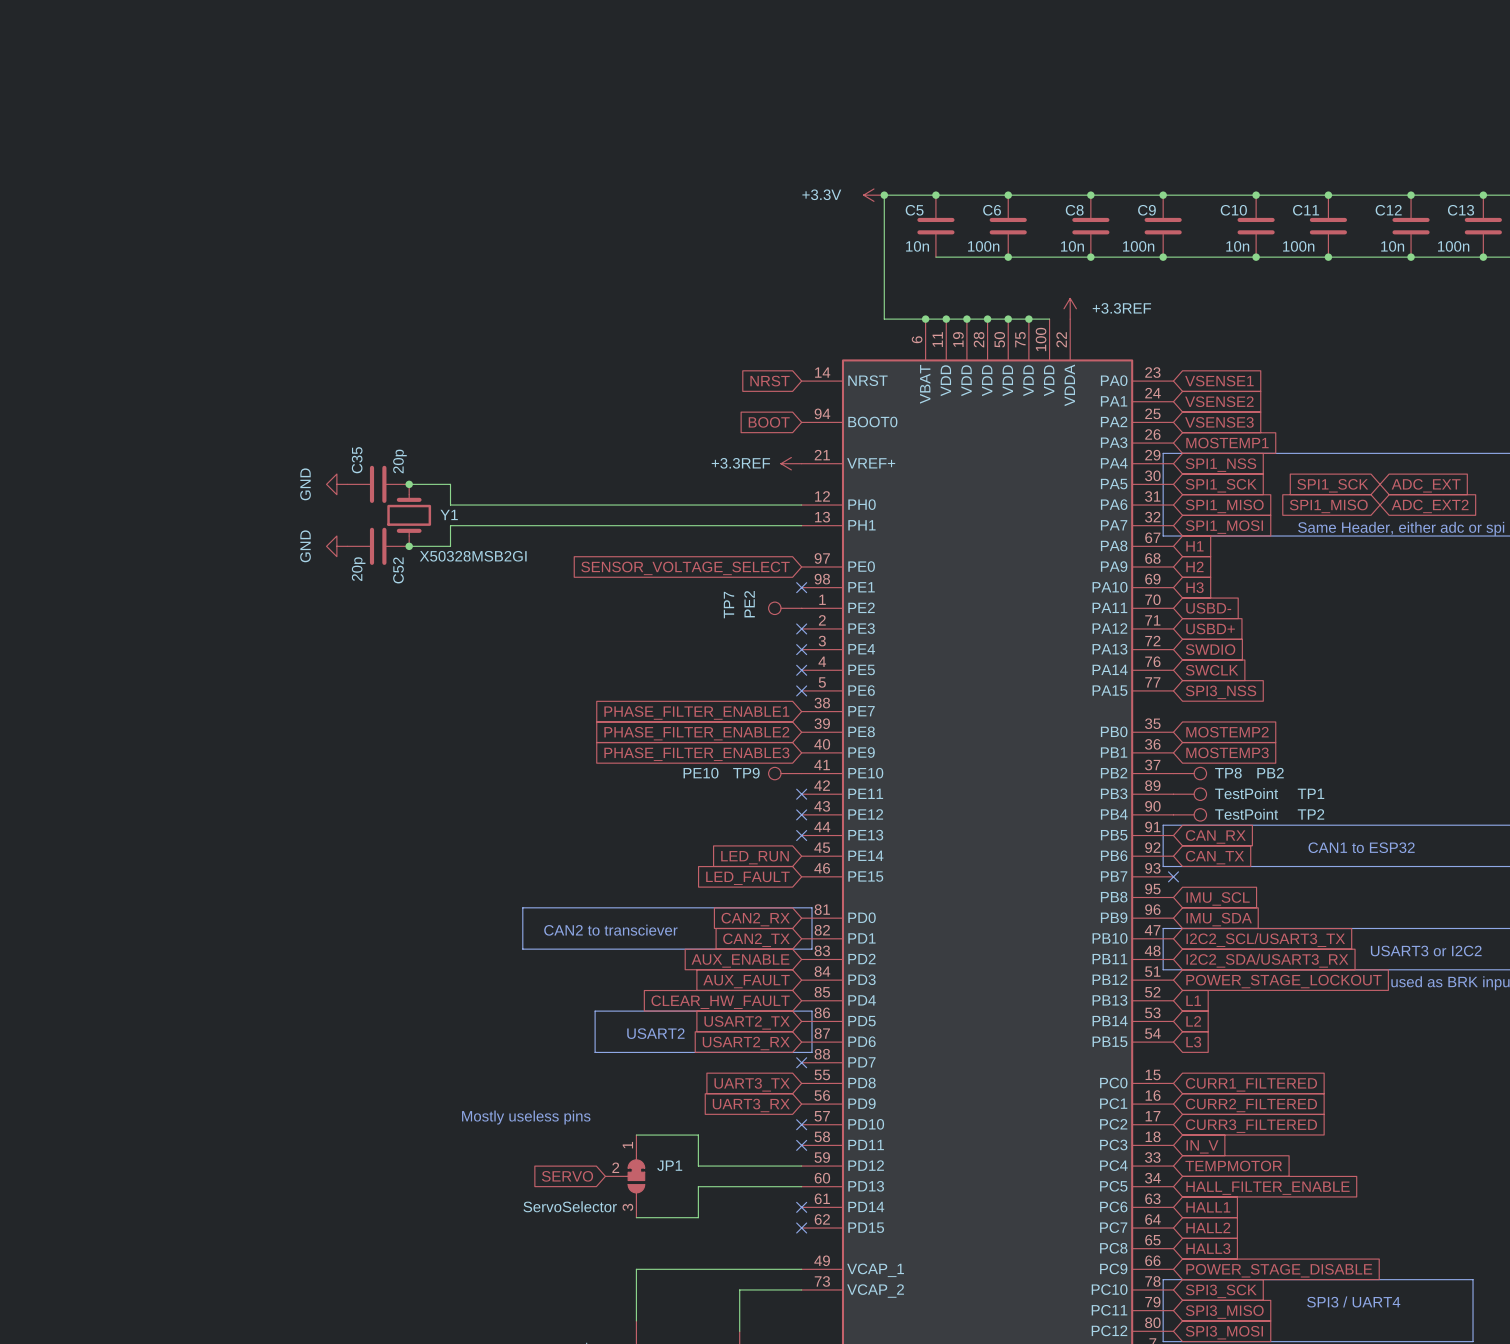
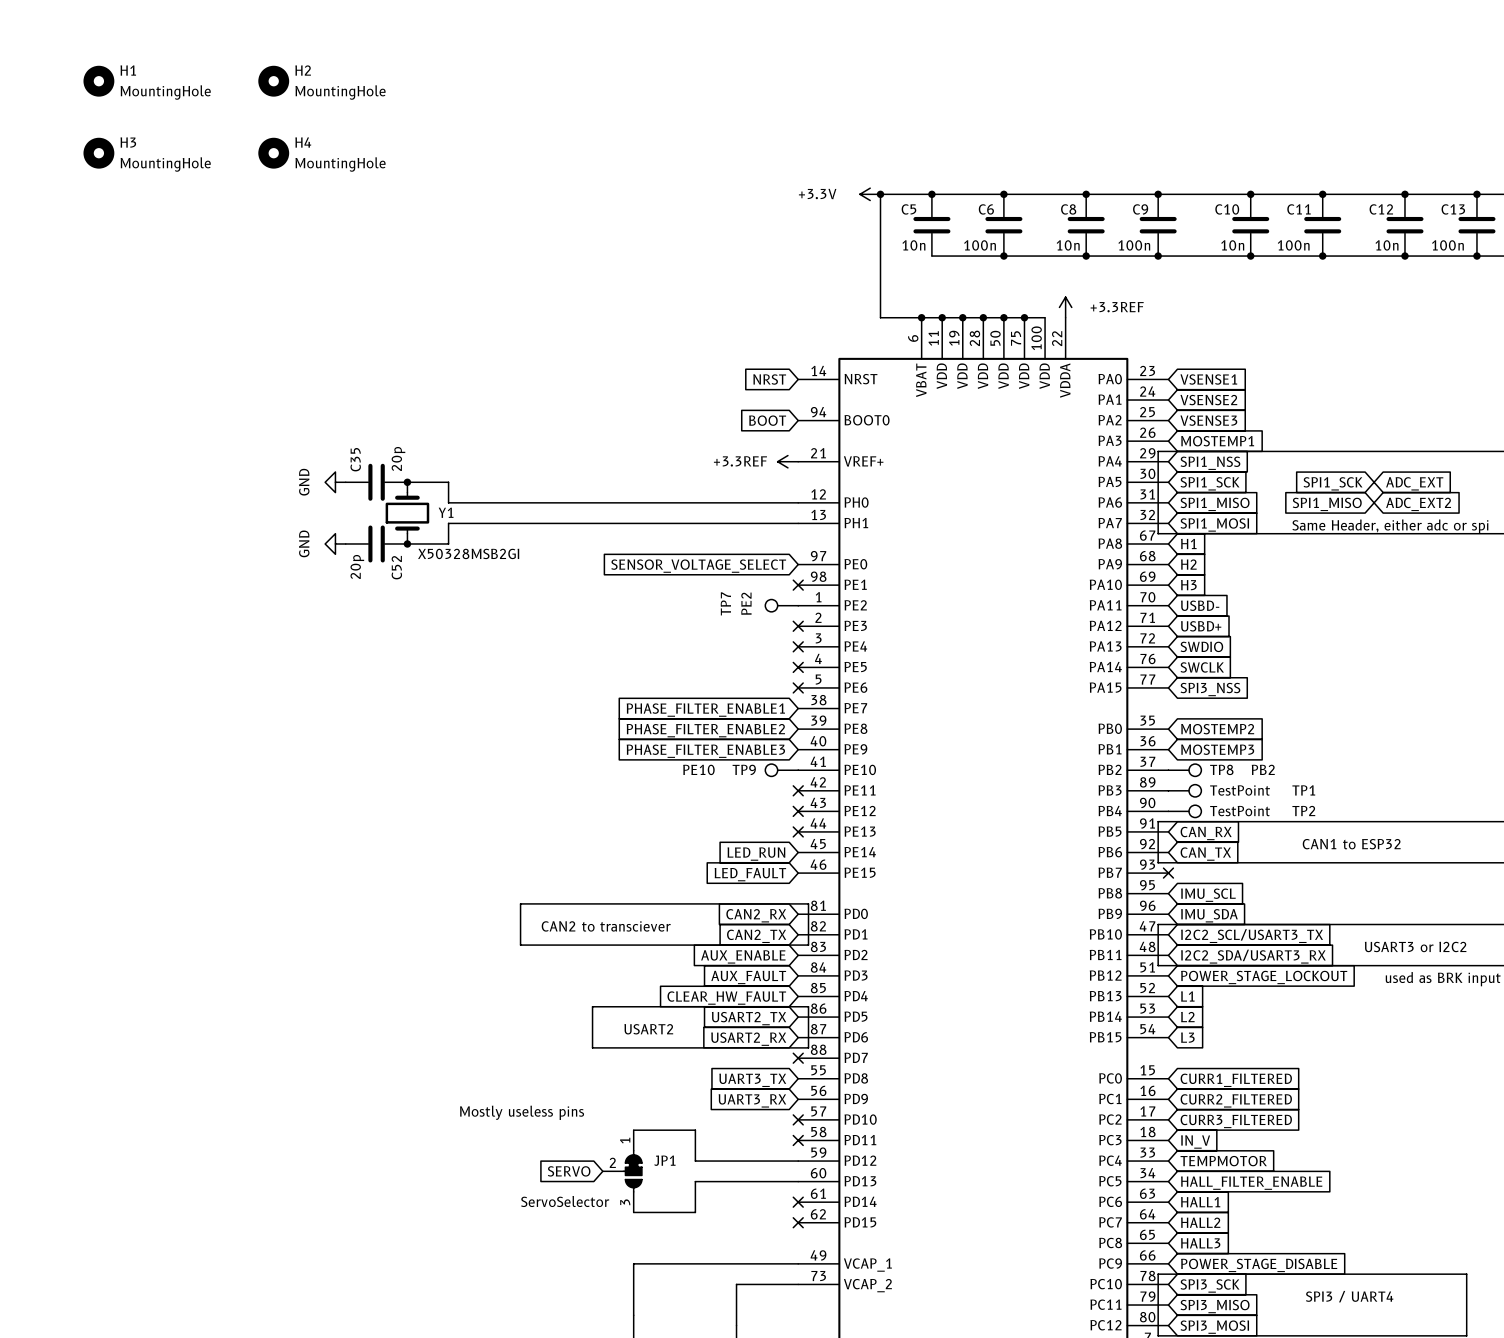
H1: none -> MountingHole (98, 81)
H2: none -> MountingHole (273, 81)
H3: none -> MountingHole (98, 153)
H4: none -> MountingHole (273, 153)

